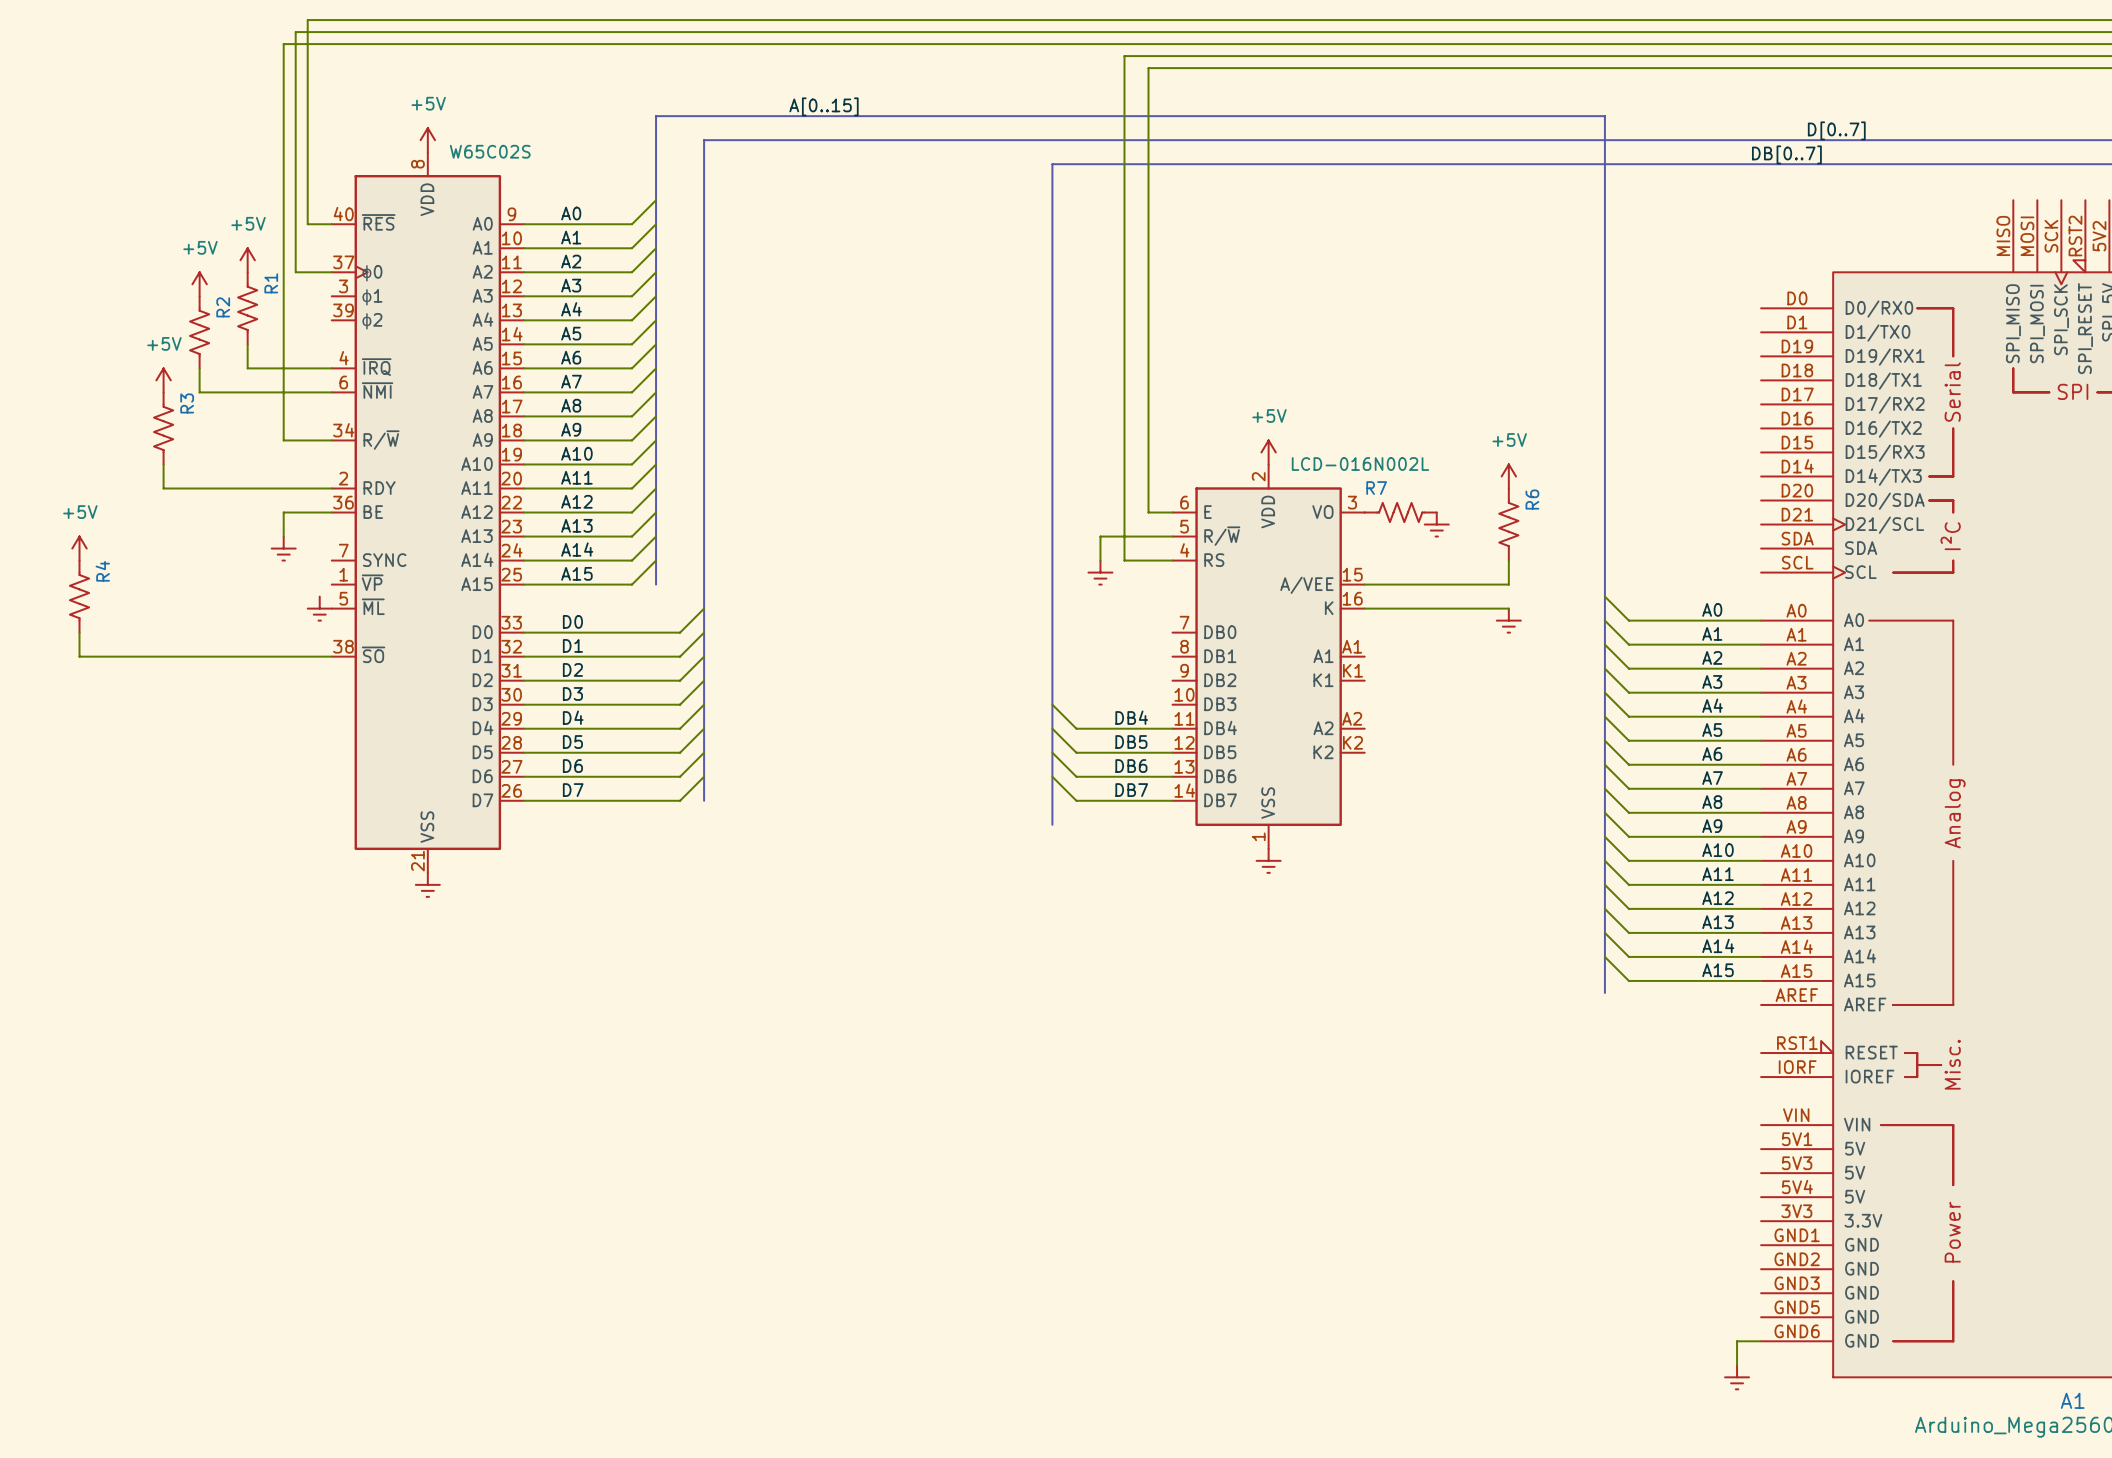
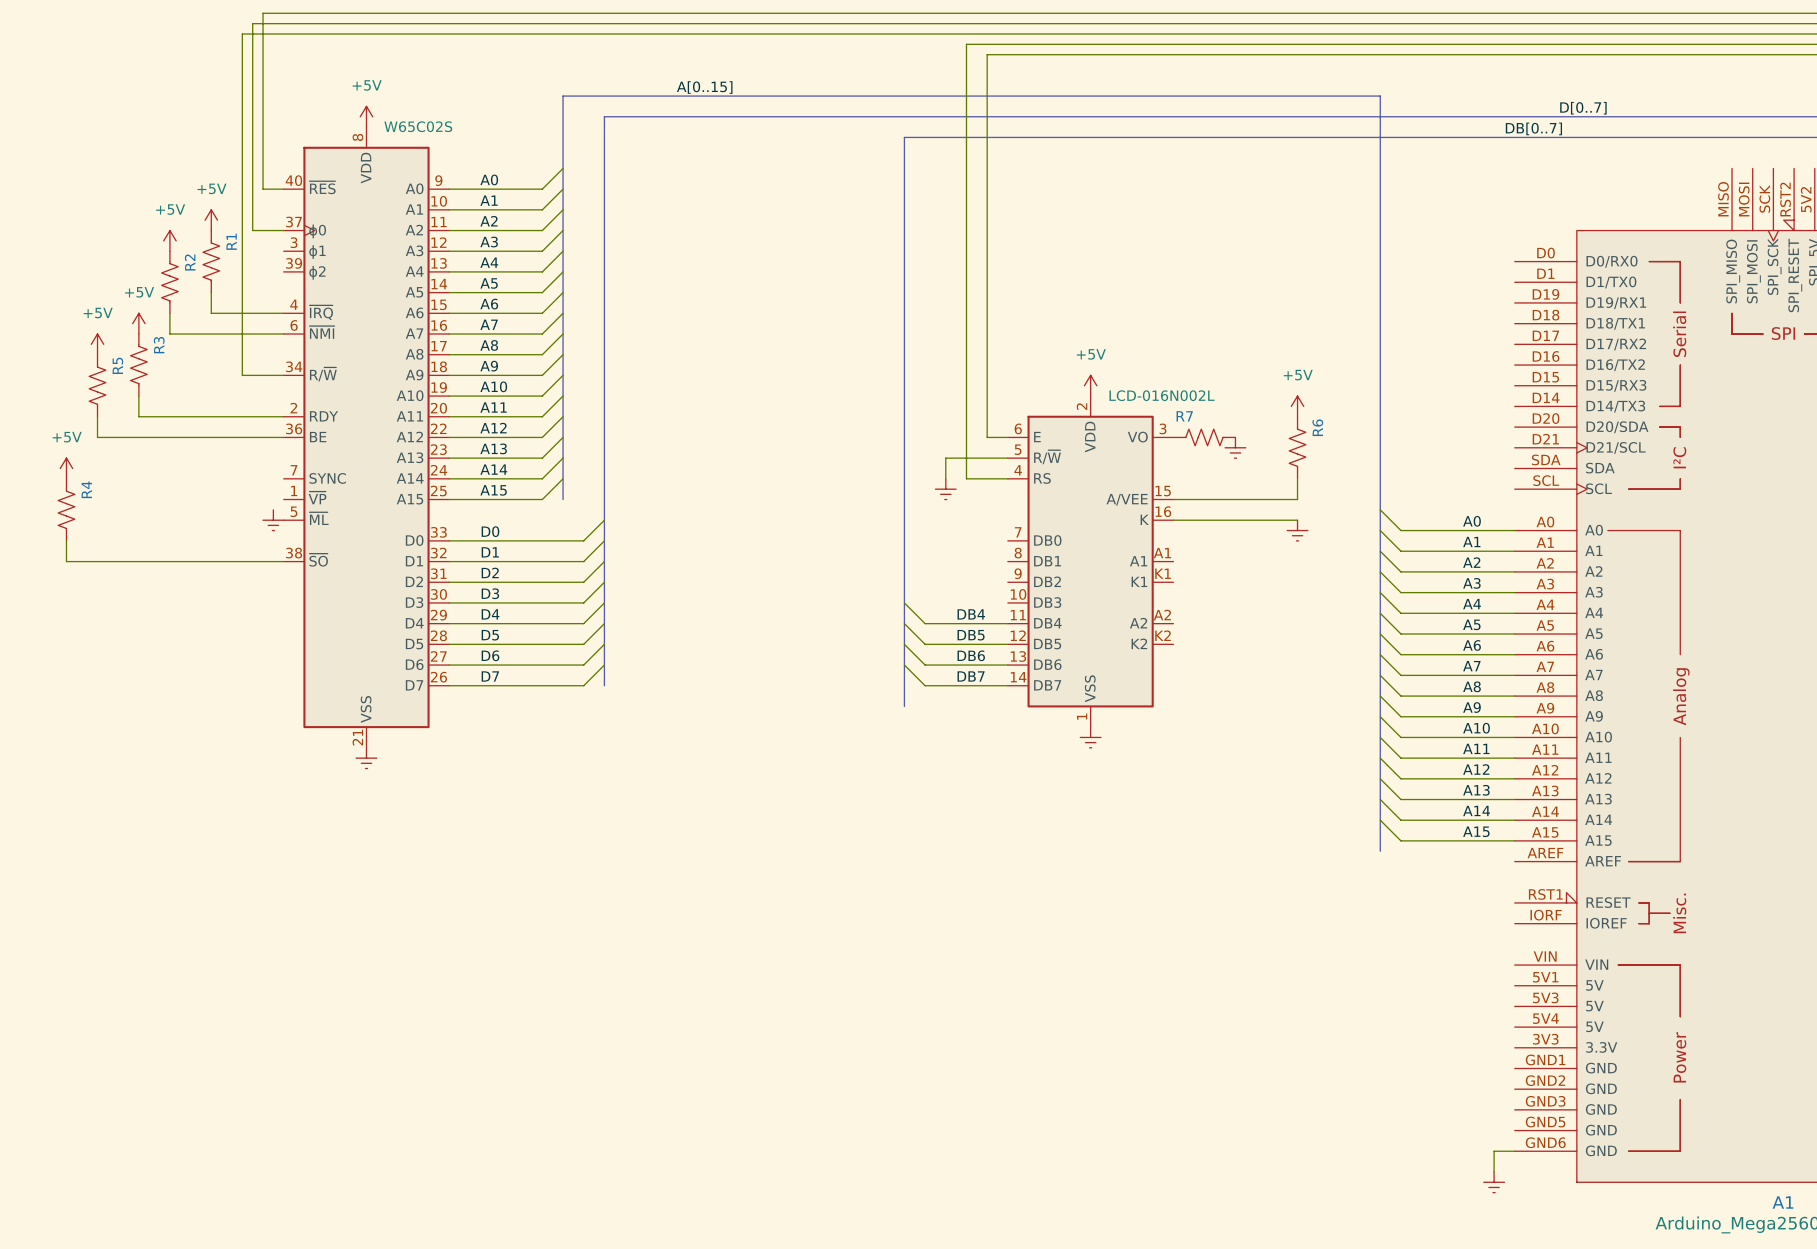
power symbol: none -> +5V (97, 344)
R5: none -> (97, 385)
wire: (283, 512) (283, 536) -> (242, 437) (97, 437) (97, 416)
power symbol: (283, 548) -> none

